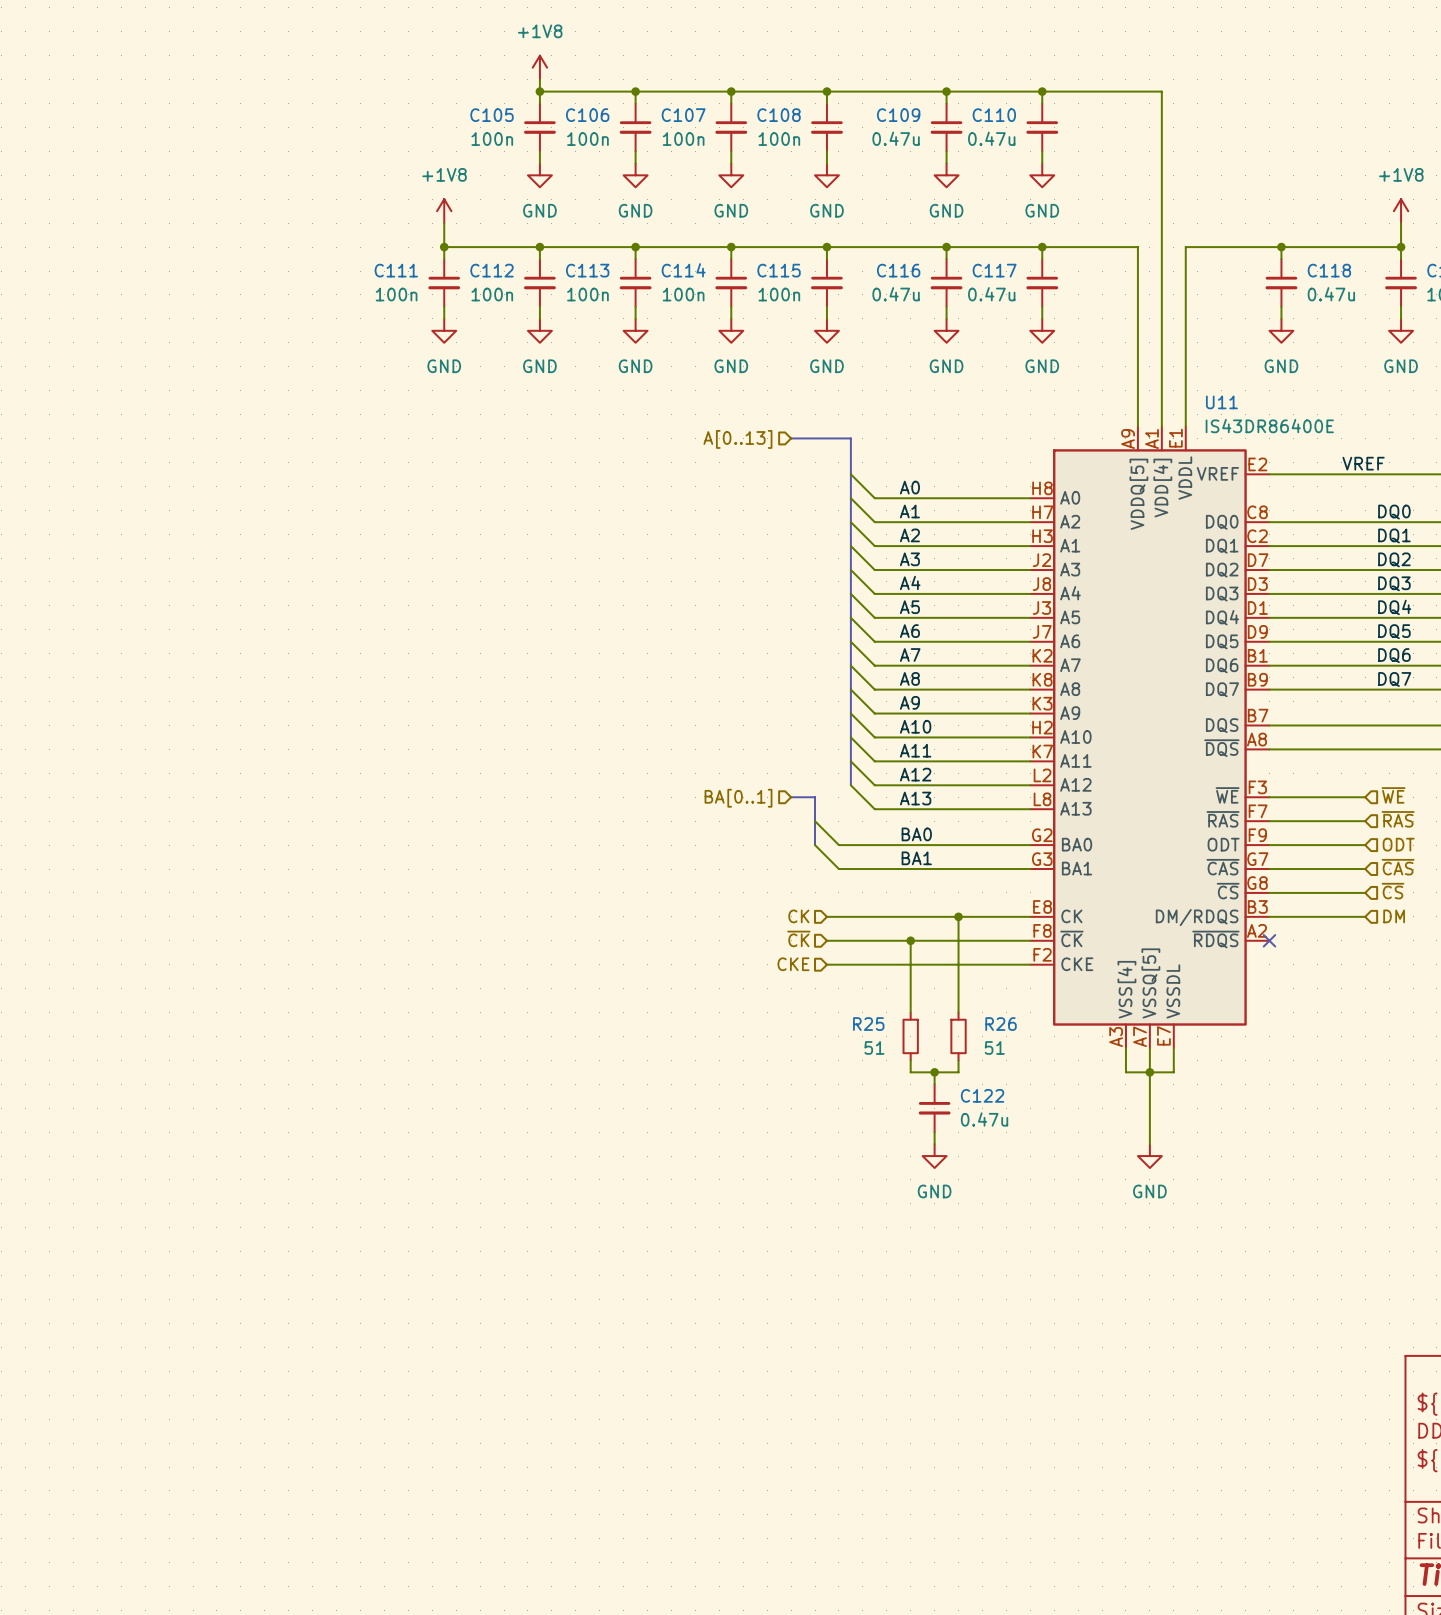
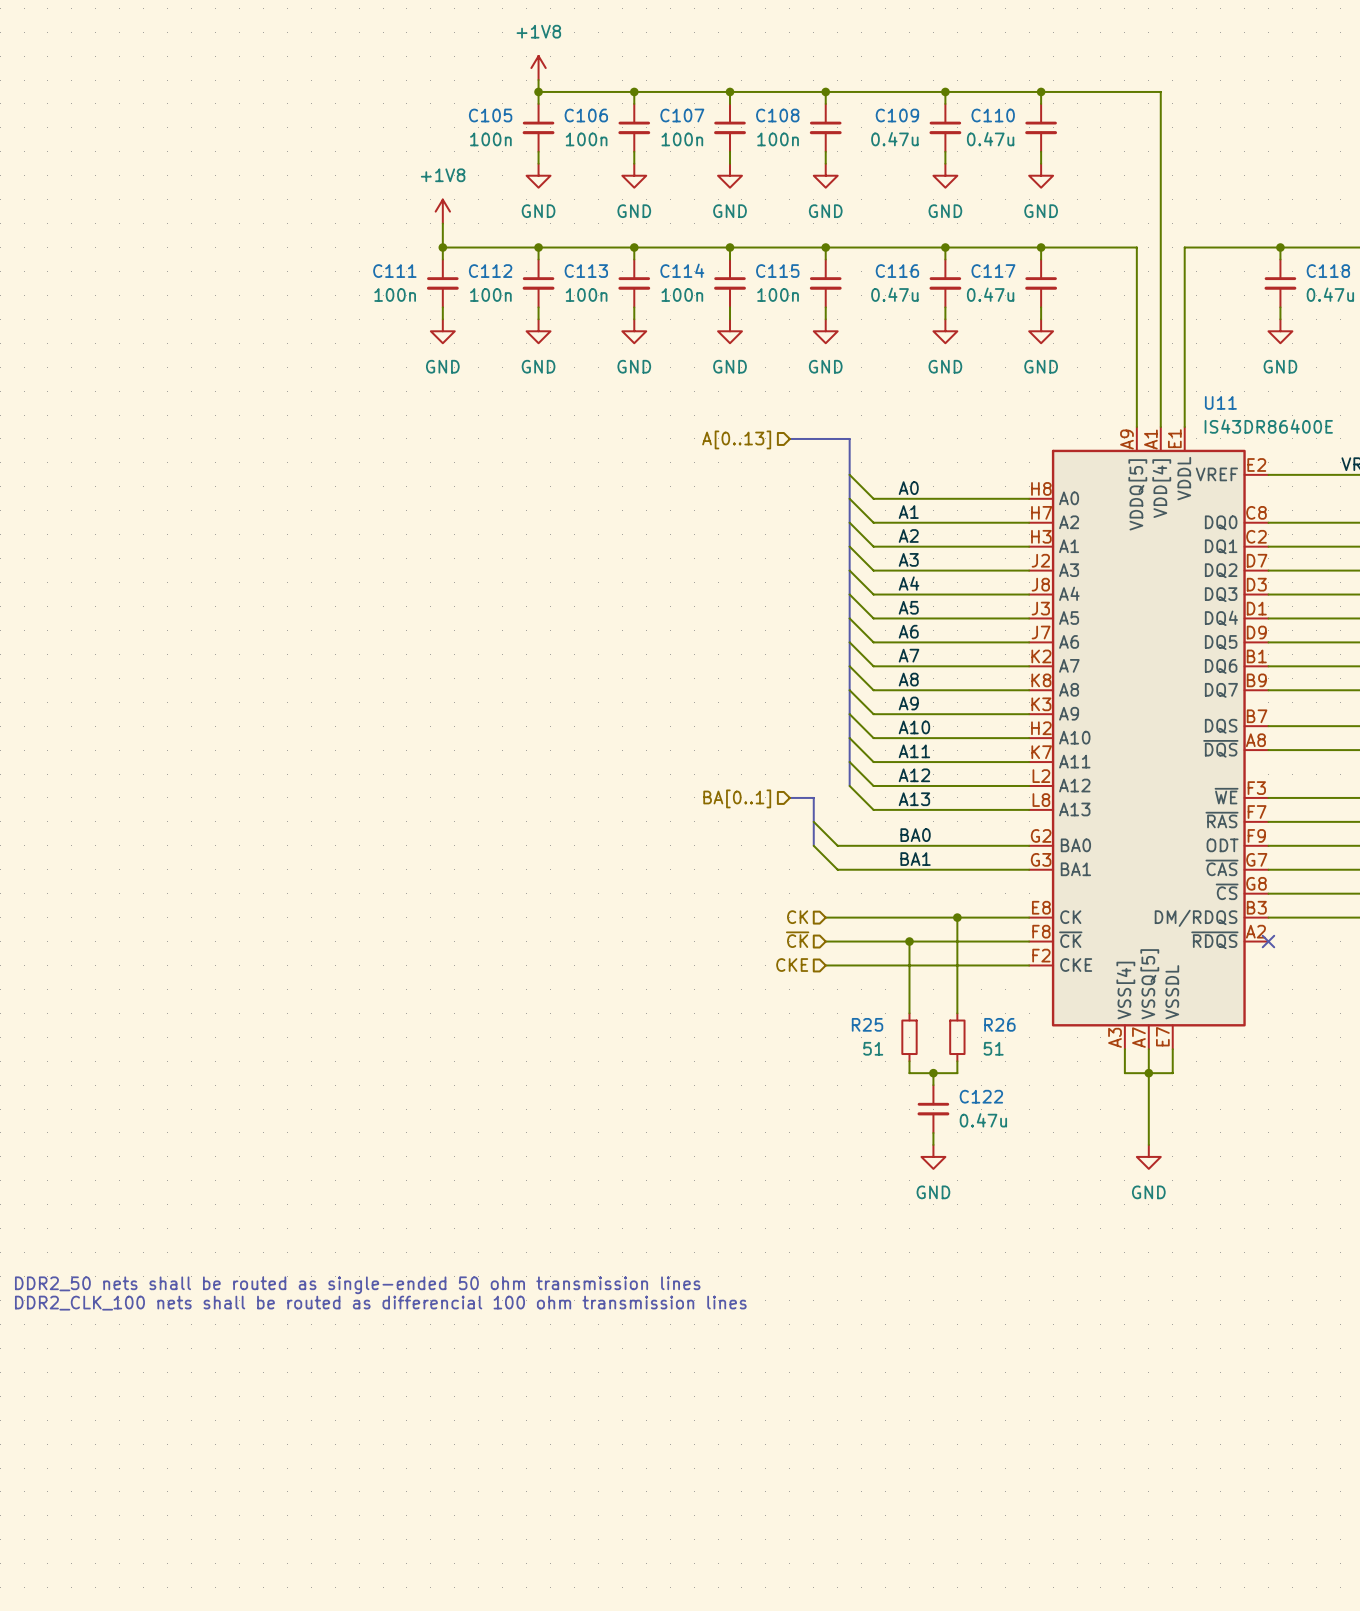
text: none -> DDR2_50 nets shall be routed as single-ended 50 ohm transmission lines (357, 1285)
text: none -> DDR2_CLK_100 nets shall be routed as differencial 100 ohm transmission lines (380, 1303)

